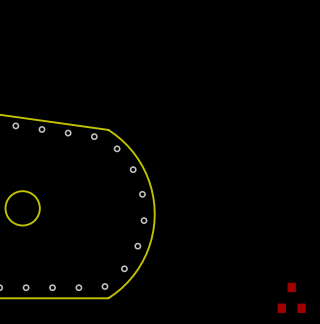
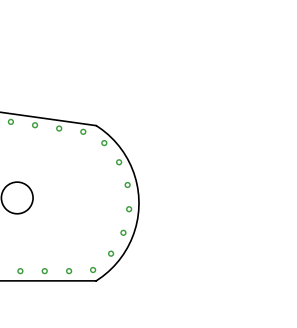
part: (291, 297) -> none

